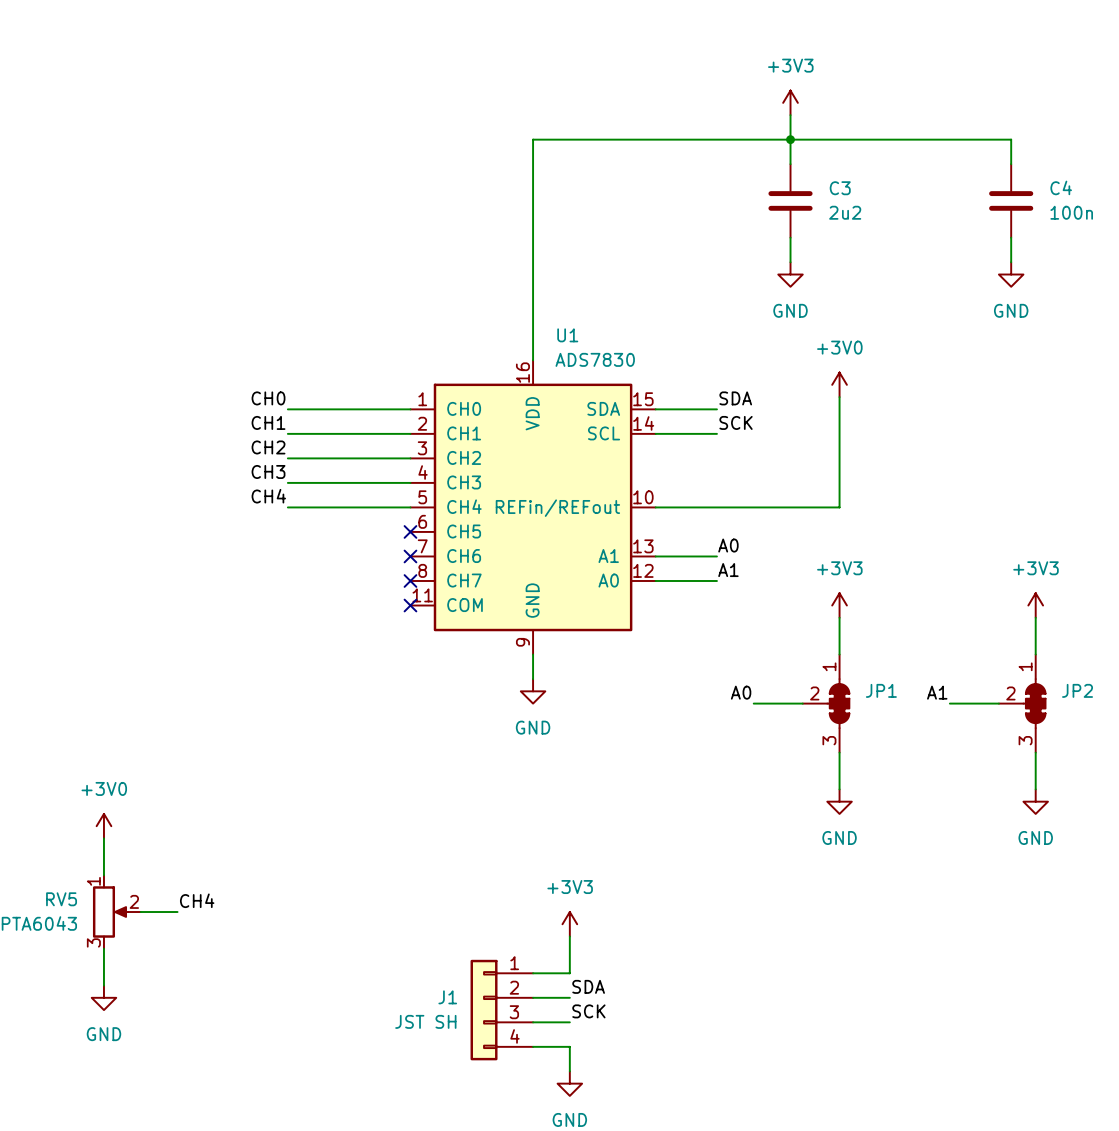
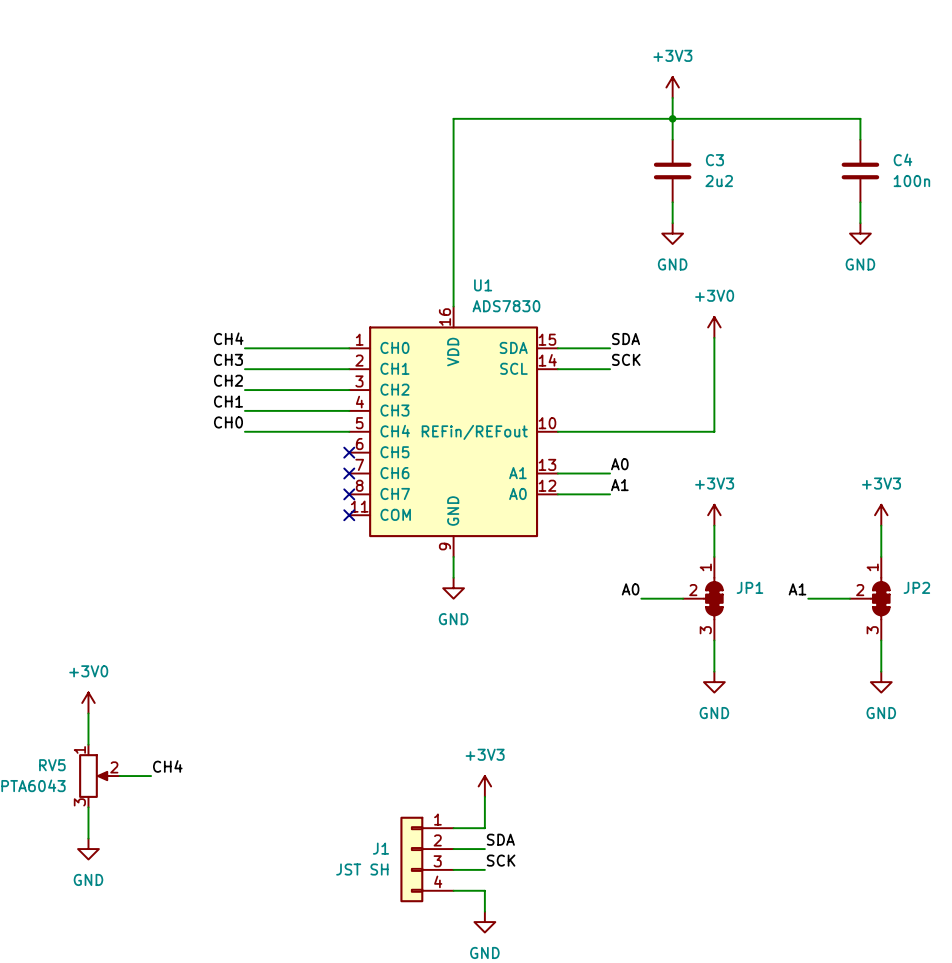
label: CH0 (268, 398) -> CH4 (228, 338)
label: CH1 (268, 422) -> CH3 (228, 359)
label: CH3 (268, 471) -> CH1 (228, 401)
label: CH4 (268, 496) -> CH0 (228, 422)

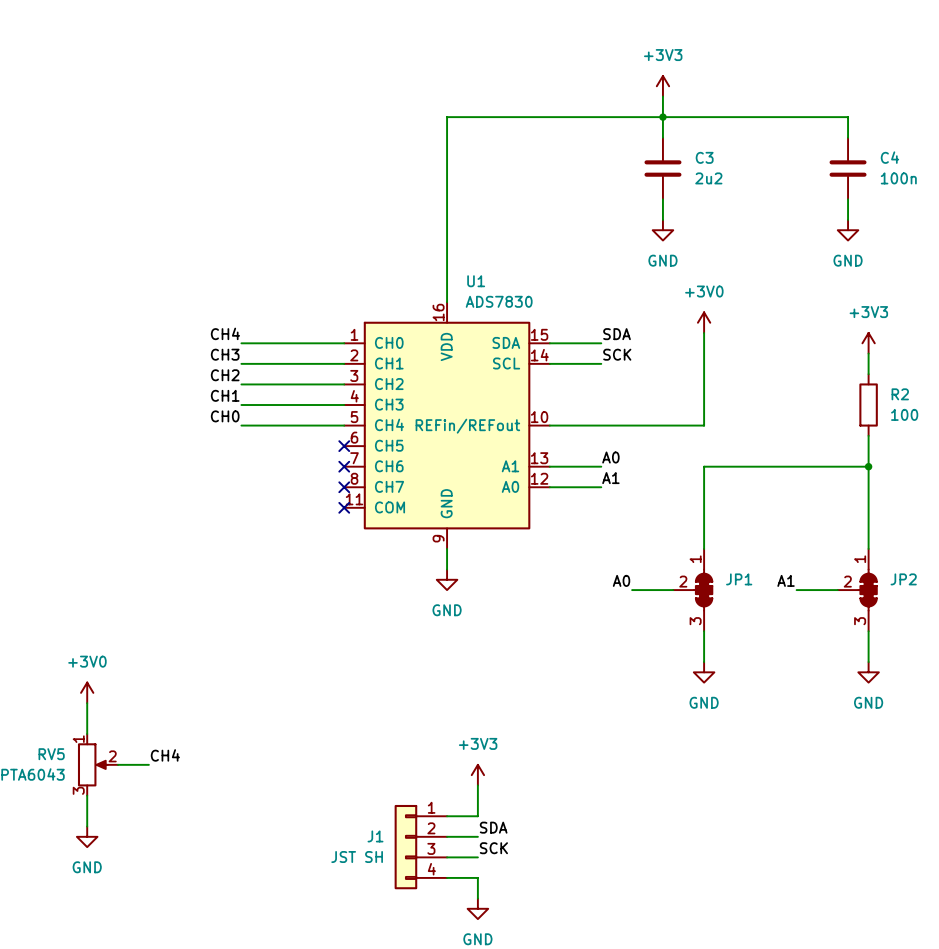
power symbol: none -> +3V3 (868, 343)
wire: none -> (868, 353) (868, 374)
R2: none -> 100 (868, 405)
wire: none -> (868, 435) (868, 518)
wire: none -> (868, 466) (704, 466) (704, 518)
junction: none -> (868, 466)
power symbol: +3V3 (714, 515) -> none
power symbol: +3V3 (881, 515) -> none

